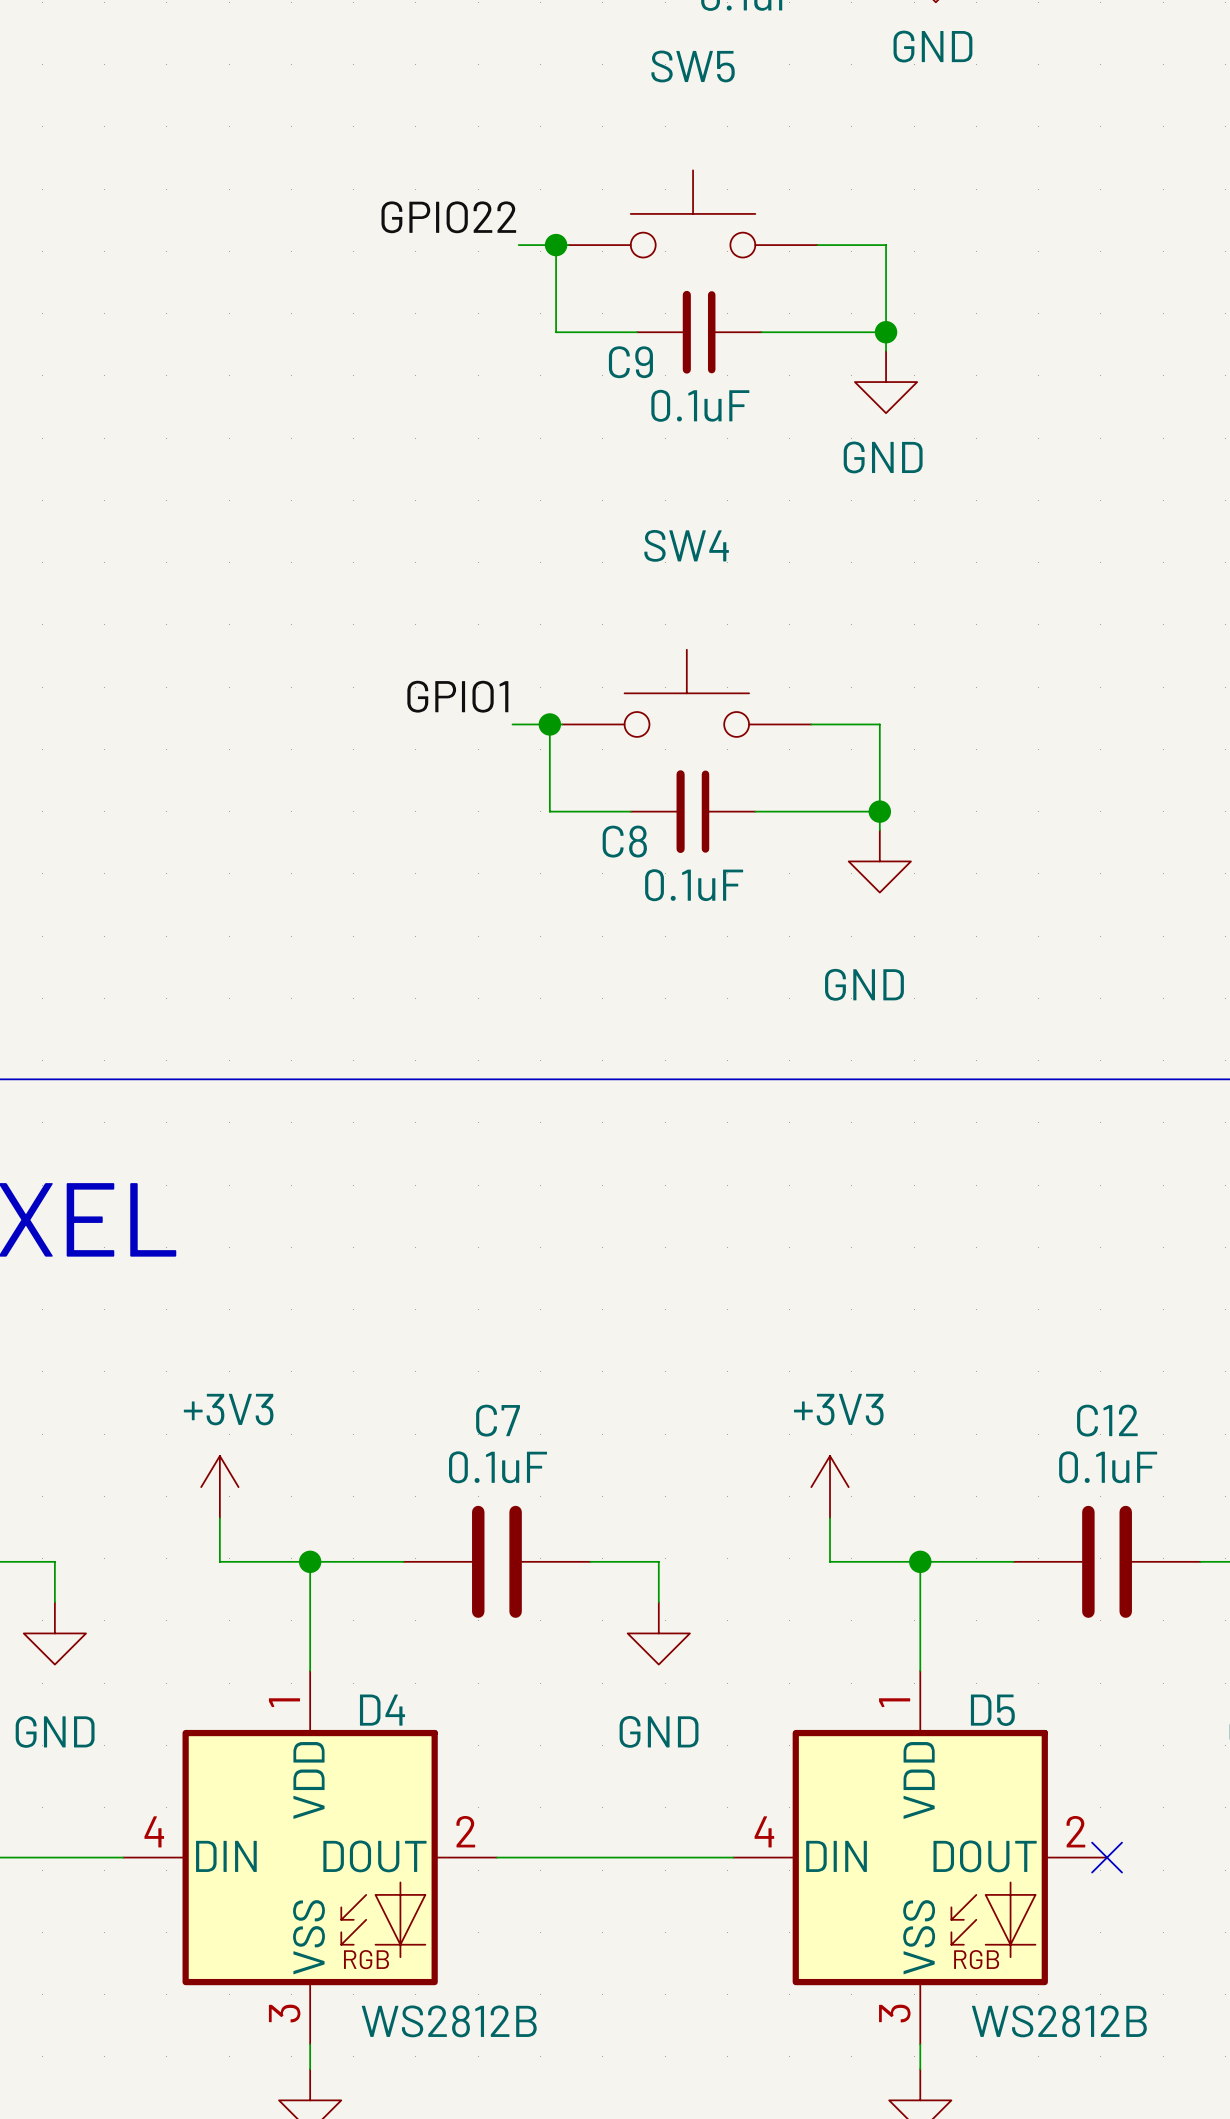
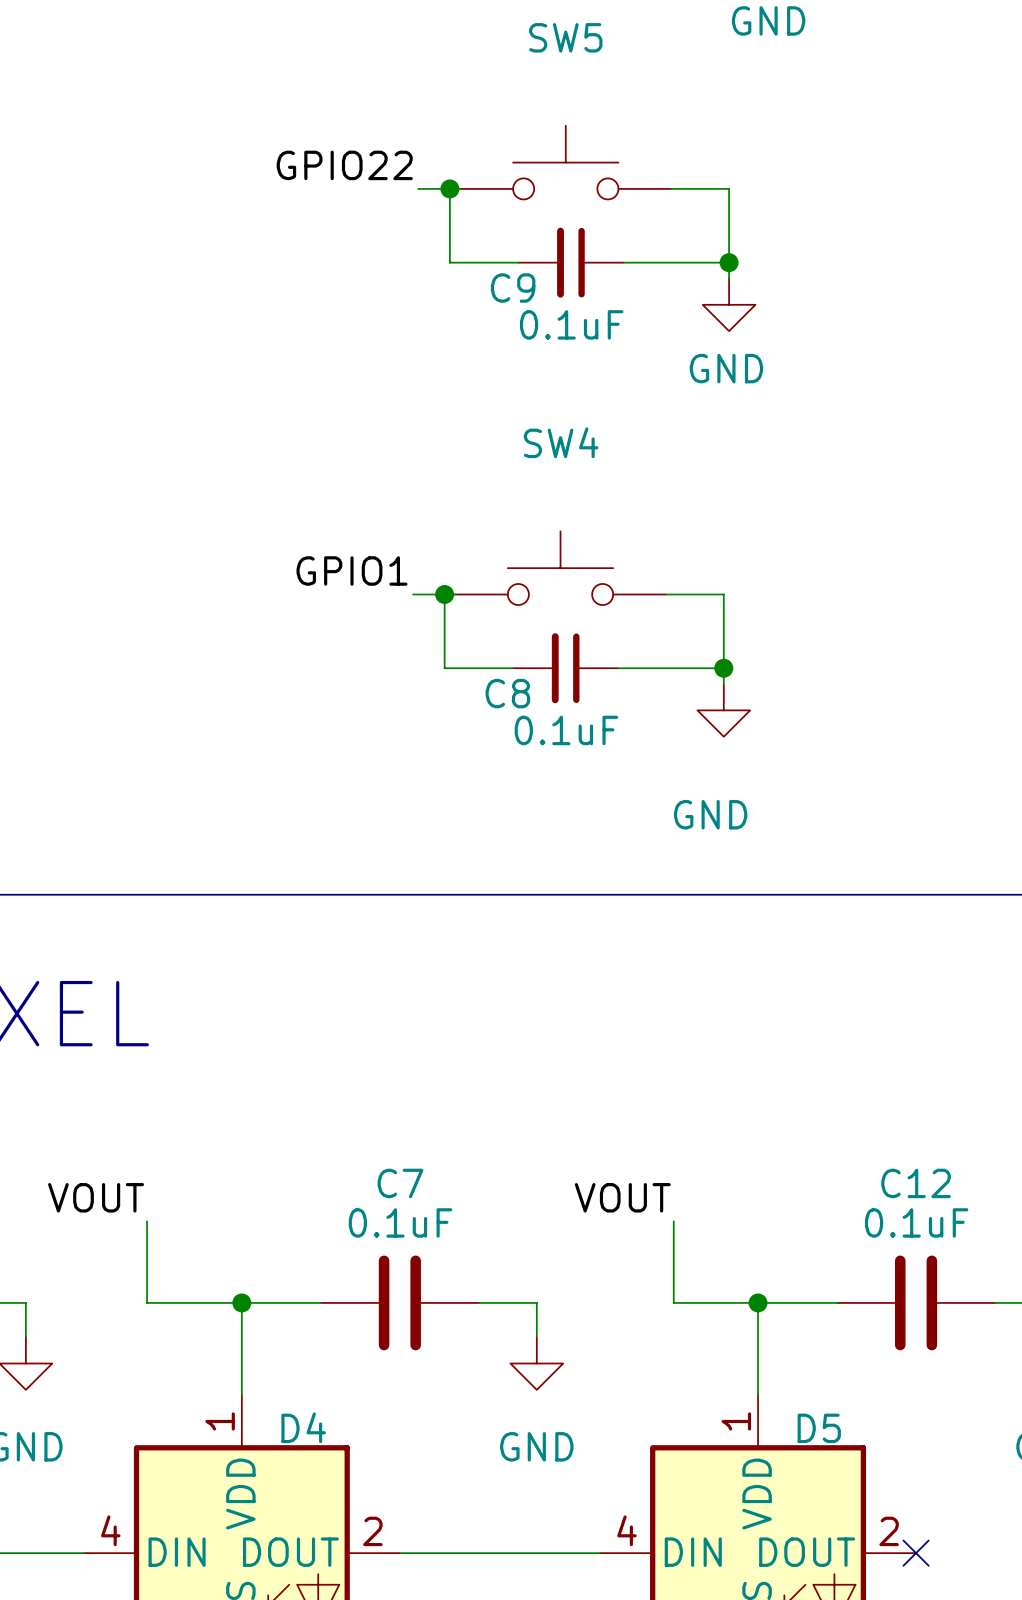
label: none -> VOUT (96, 1197)
label: none -> VOUT (622, 1197)
power symbol: +3V3 (219, 1487) -> none
power symbol: +3V3 (830, 1487) -> none
wire: (219, 1518) (219, 1561) -> (147, 1221) (147, 1302) (165, 1302)
wire: (830, 1518) (830, 1561) -> (673, 1221) (673, 1302) (681, 1302)

